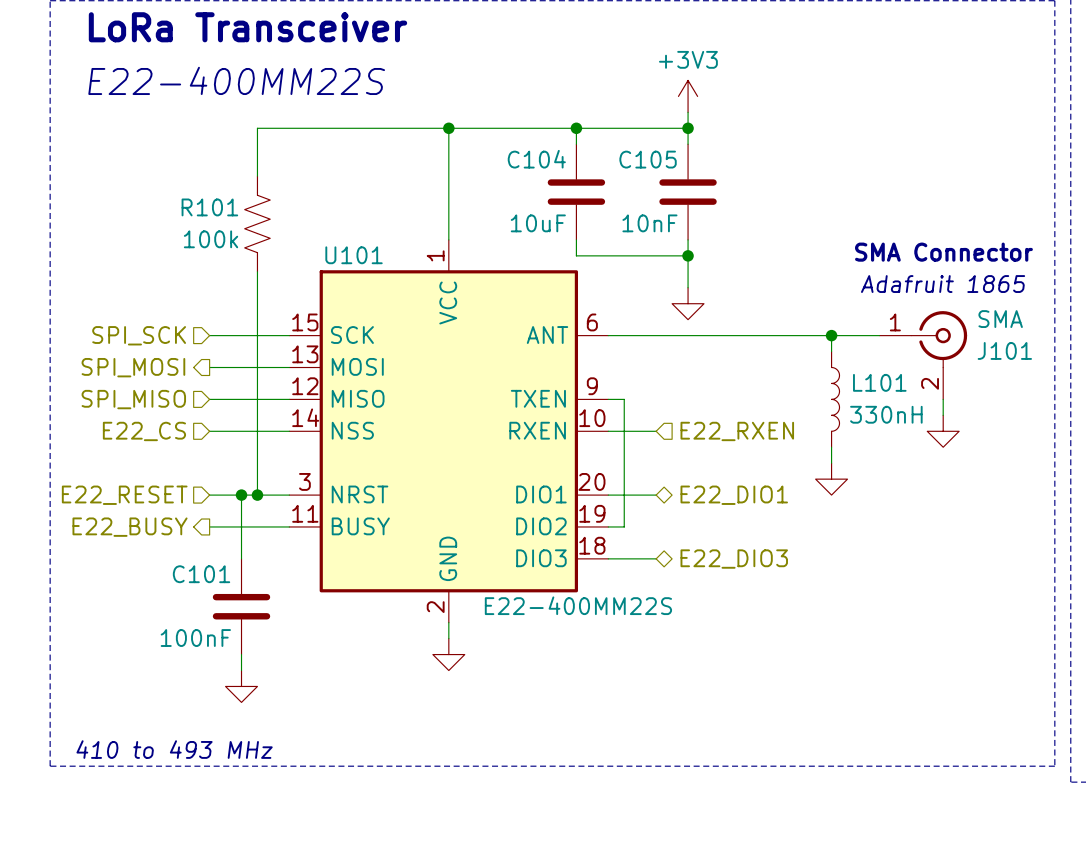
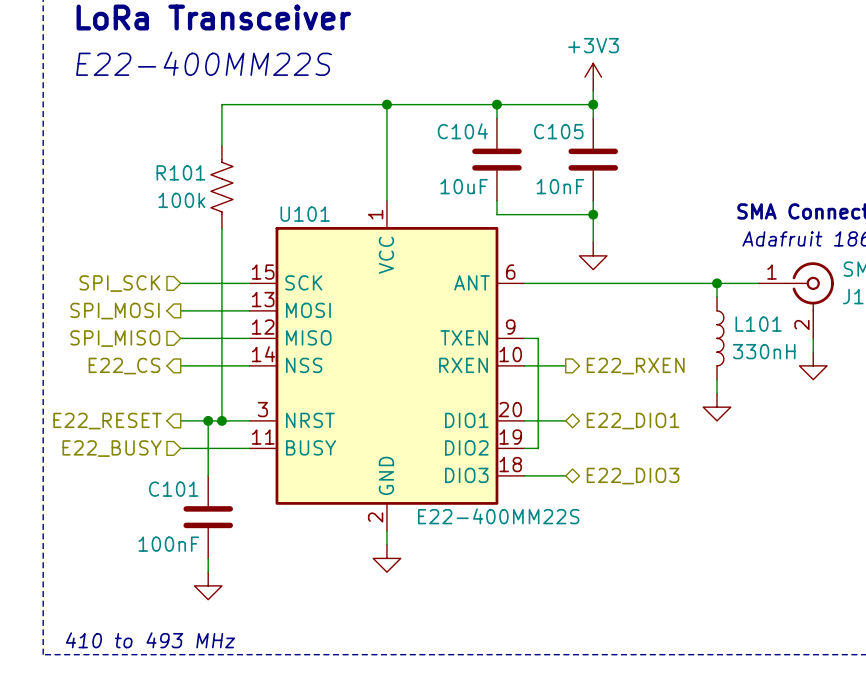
hierarchical label shape: input (144, 431) -> output (124, 366)
hierarchical label shape: input (737, 431) -> output (635, 366)
hierarchical label shape: input (124, 495) -> output (107, 421)
hierarchical label shape: output (130, 527) -> input (112, 448)

